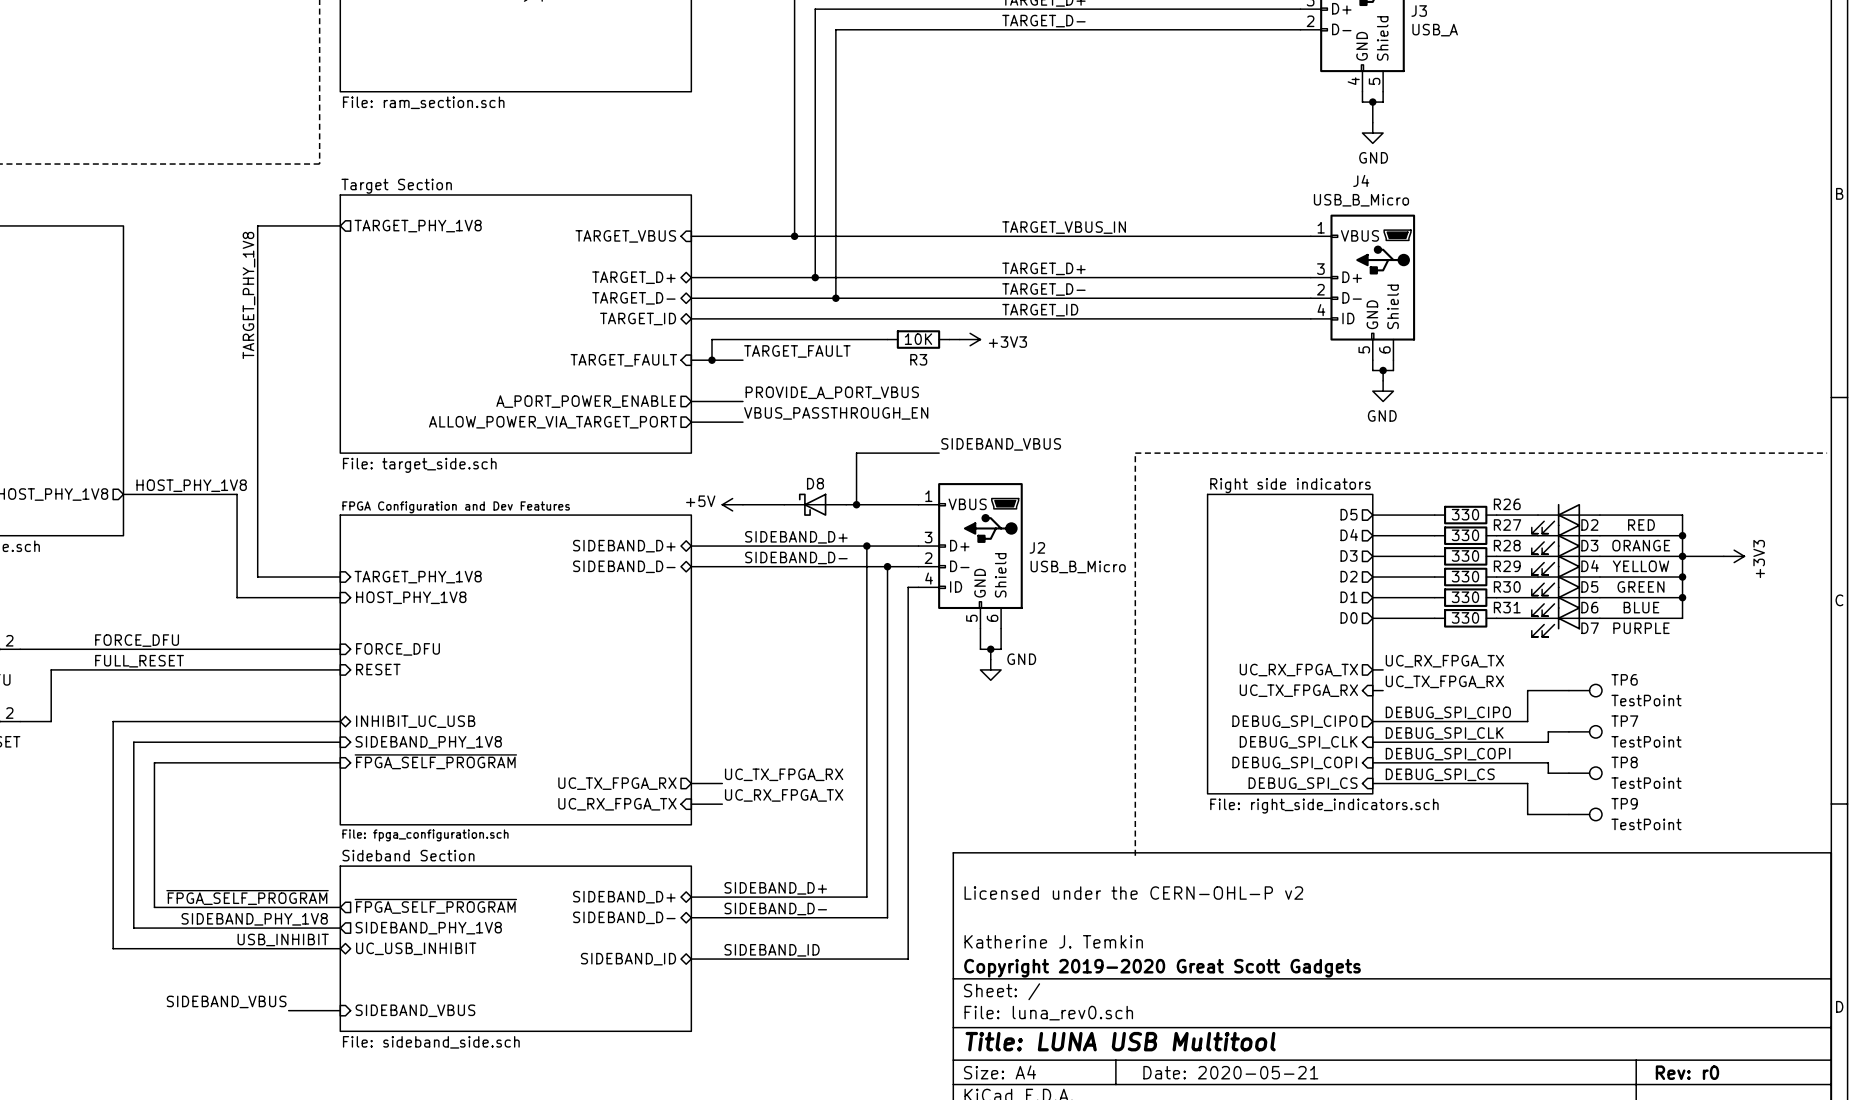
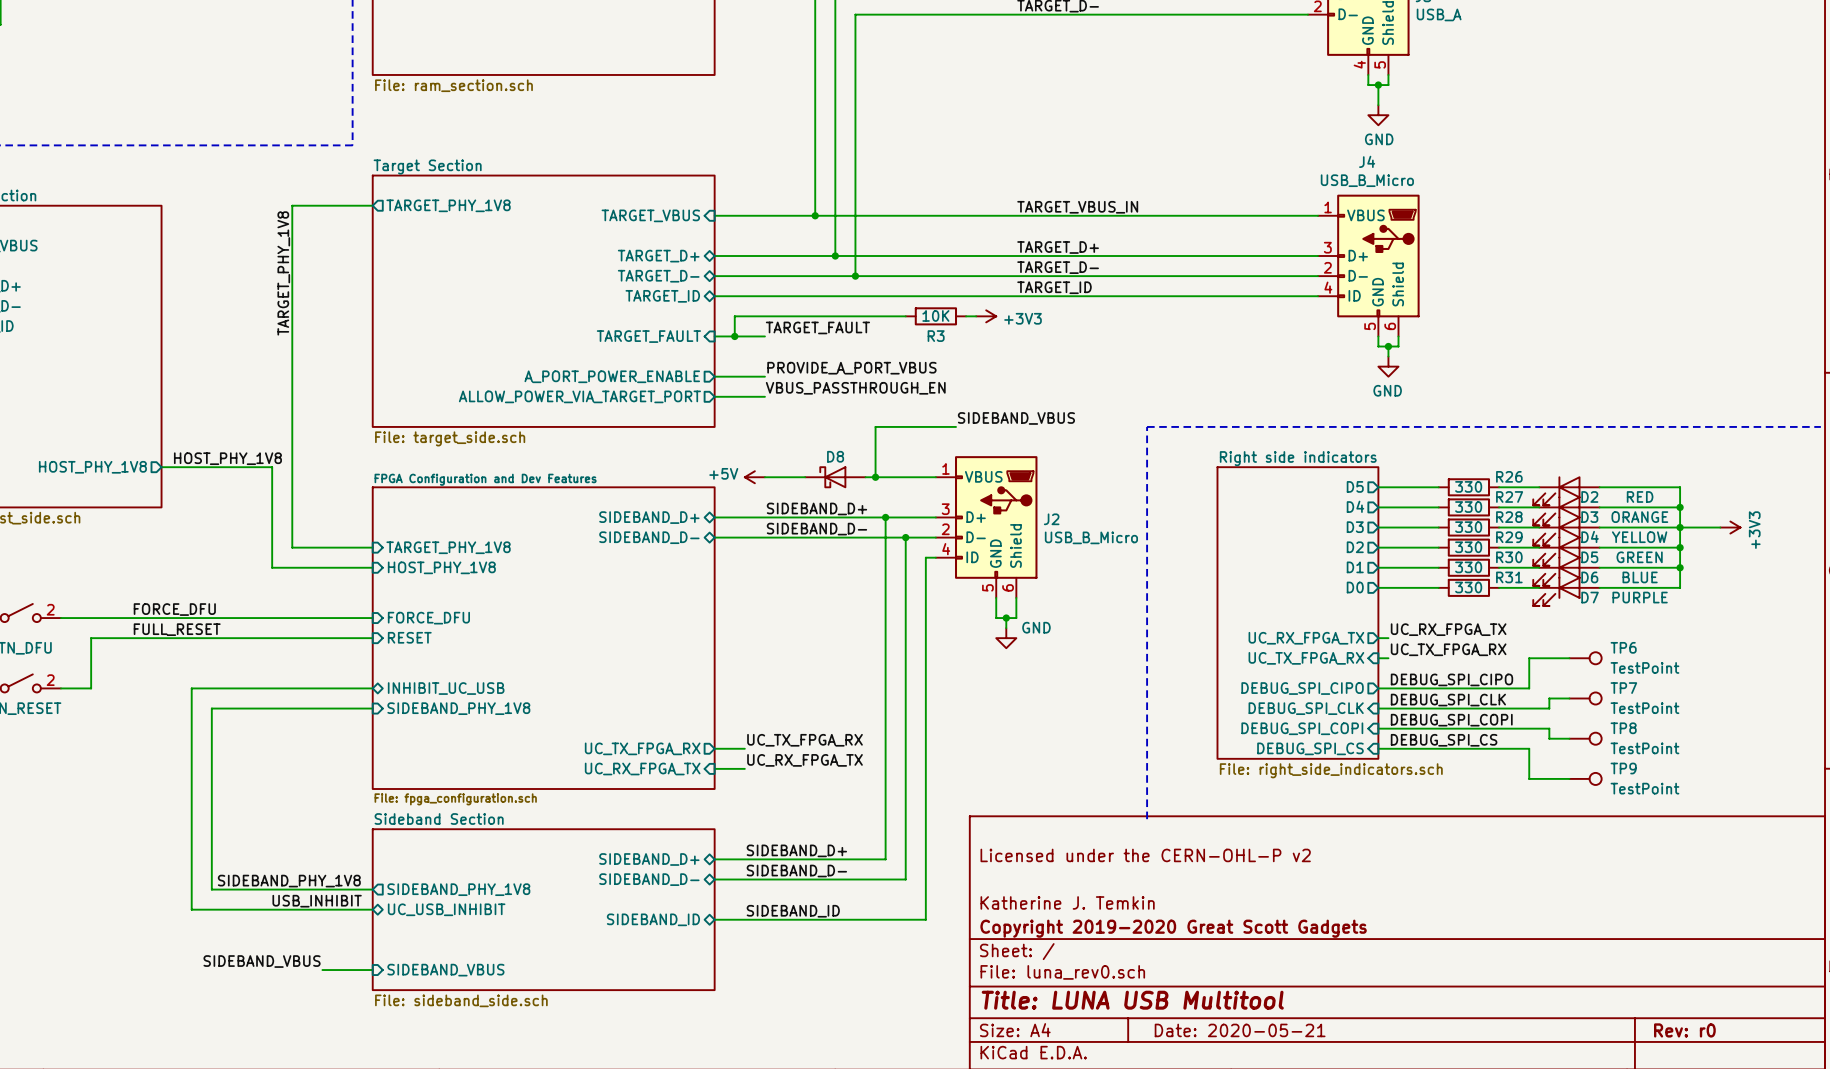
wire: (154, 721) (113, 721) (113, 948) (154, 948) -> (191, 869) (191, 909)
wire: (175, 742) (133, 742) (133, 928) (175, 928) -> (211, 708) (211, 889)
sheet pin: ~{FPGA_SELF_PROGRAM} (435, 761) -> none
wire: (154, 762) (340, 762) -> (191, 728) (191, 688)
label: ~{FPGA_SELF_PROGRAM} (247, 897) -> none
sheet pin: ~{FPGA_SELF_PROGRAM} (435, 906) -> none
wire: (154, 907) (340, 907) -> none

